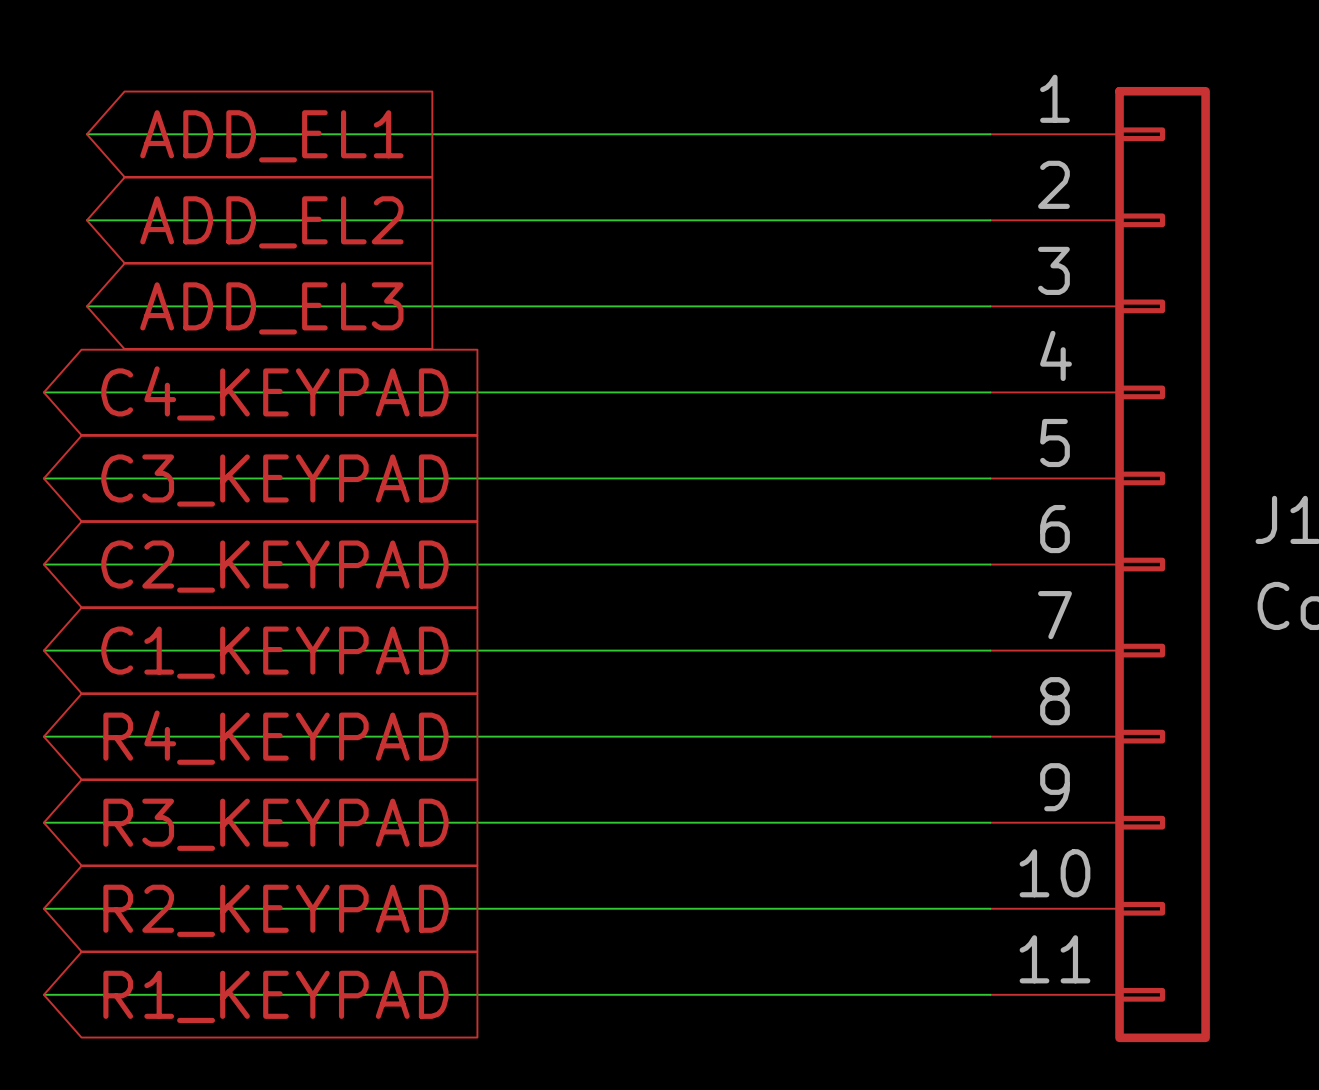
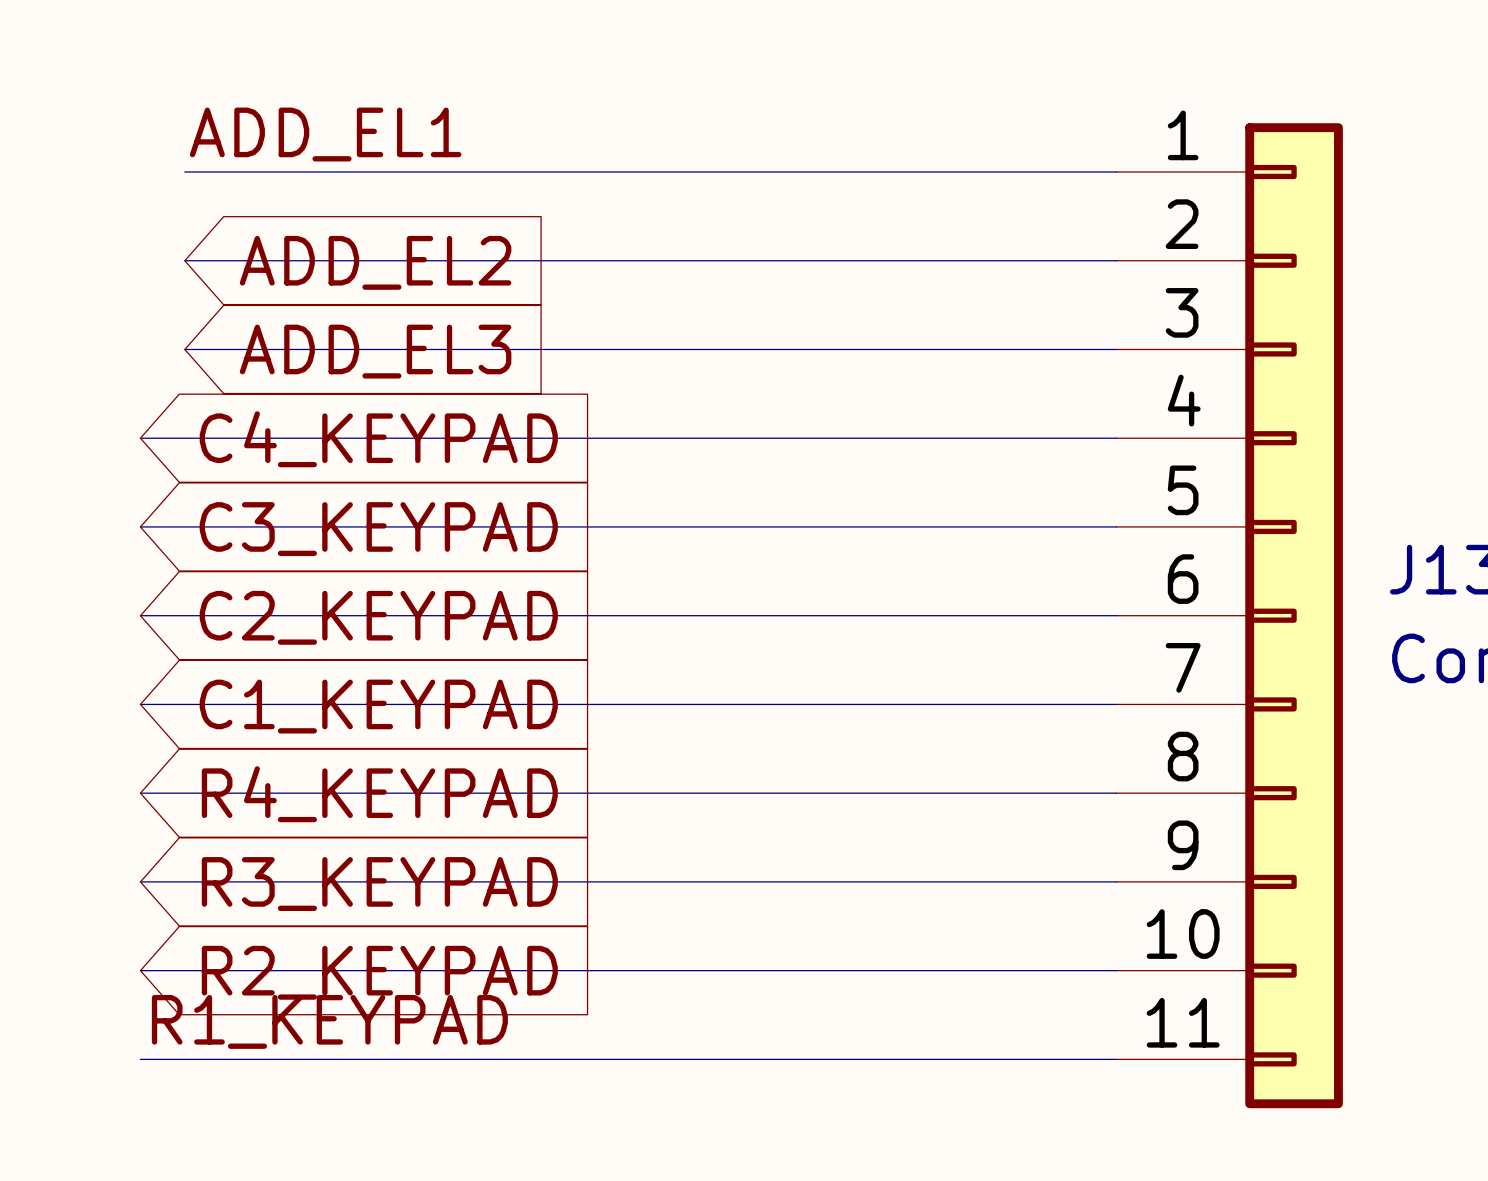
label: none -> ADD_EL1 (325, 134)
global label: ADD_EL1 (271, 136) -> none
label: none -> R1_KEYPAD (329, 1021)
global label: R1_KEYPAD (275, 996) -> none

